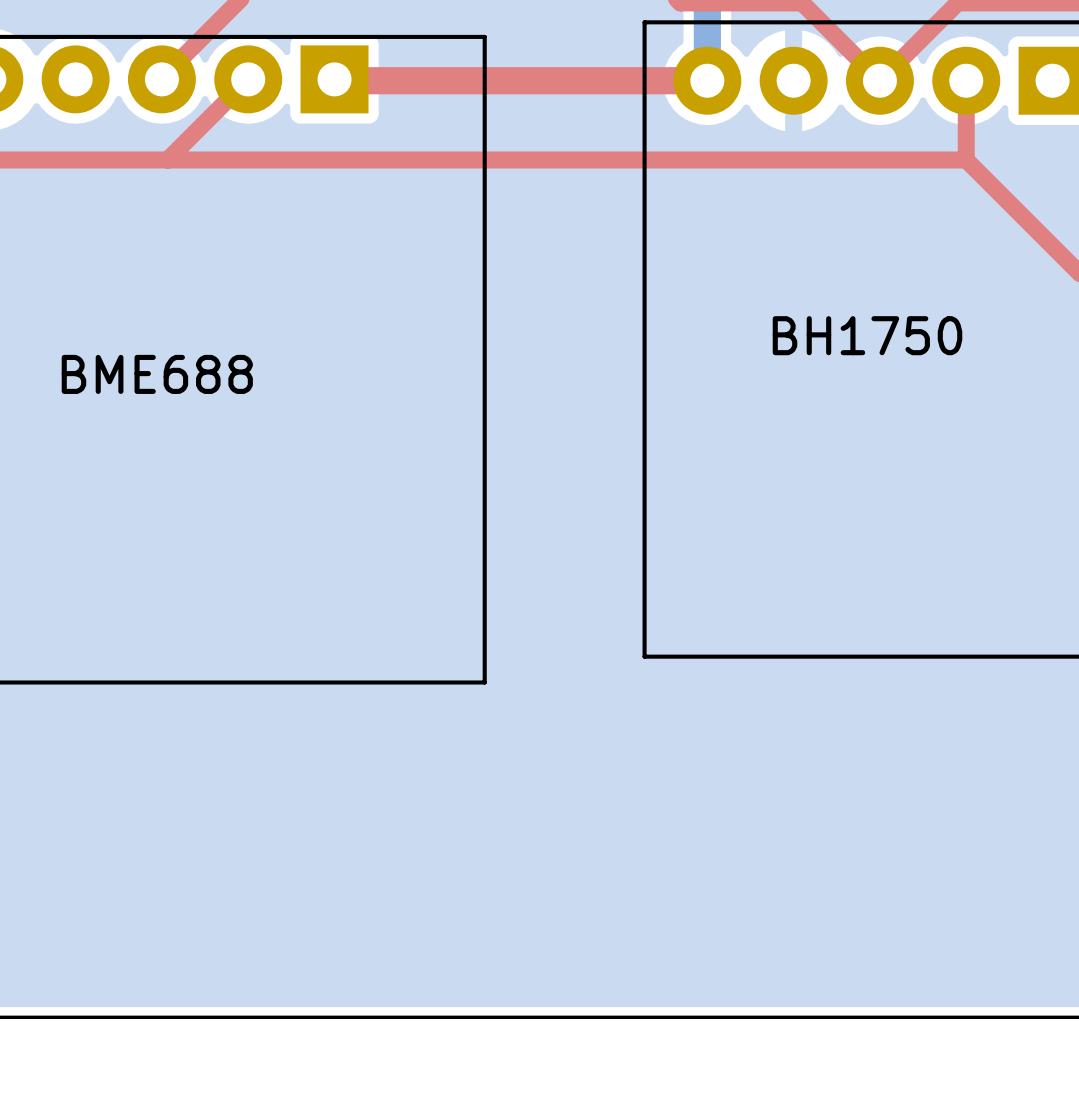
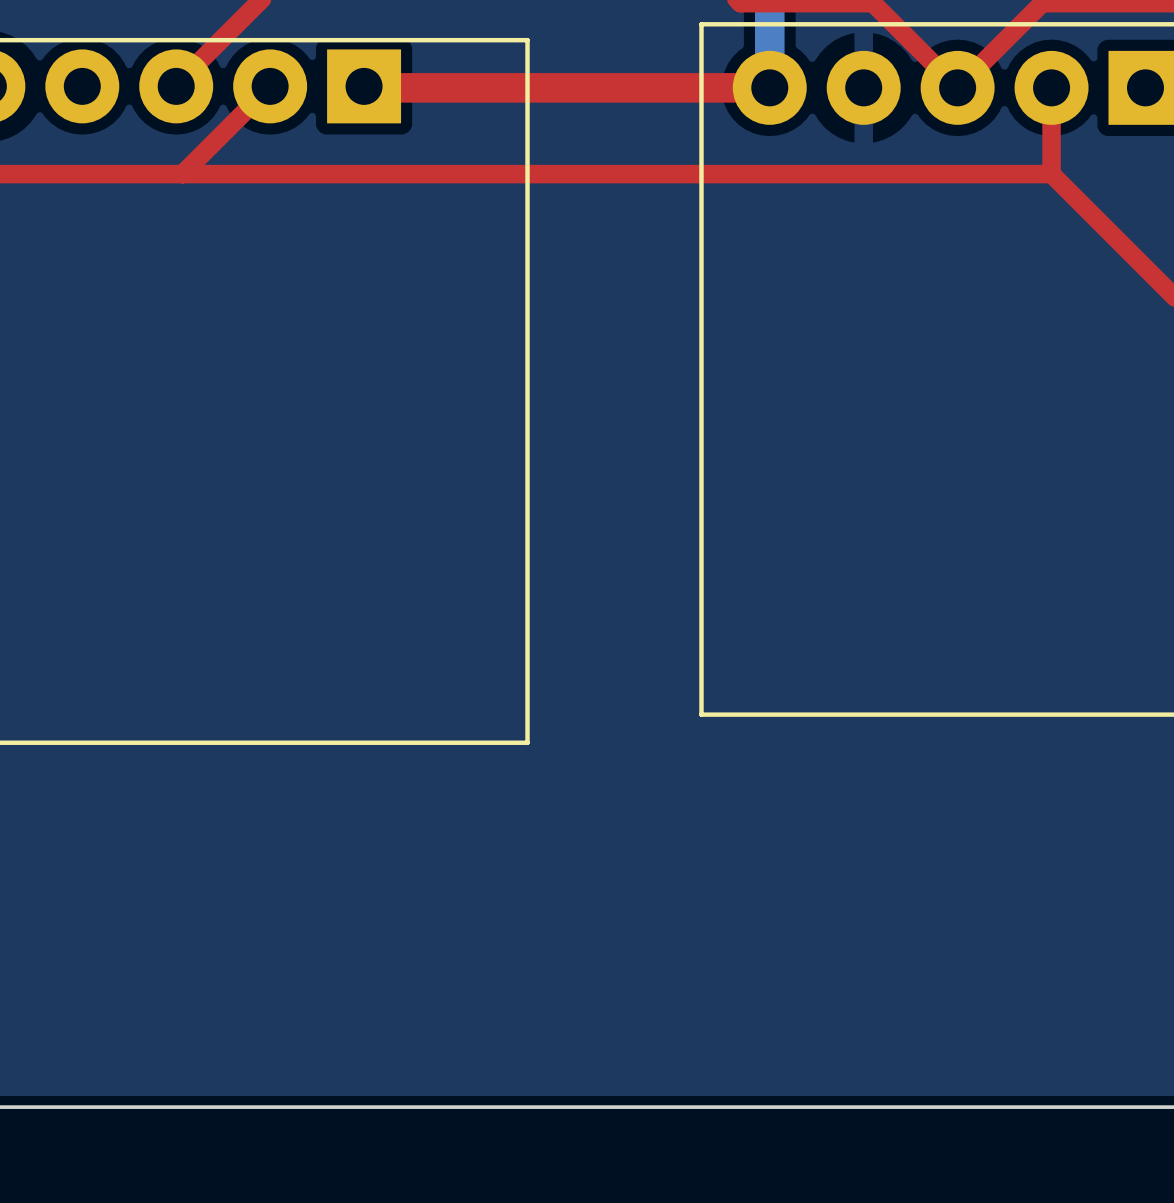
part value: BH1750 (867, 335) -> none
part value: BME688 (157, 374) -> none

